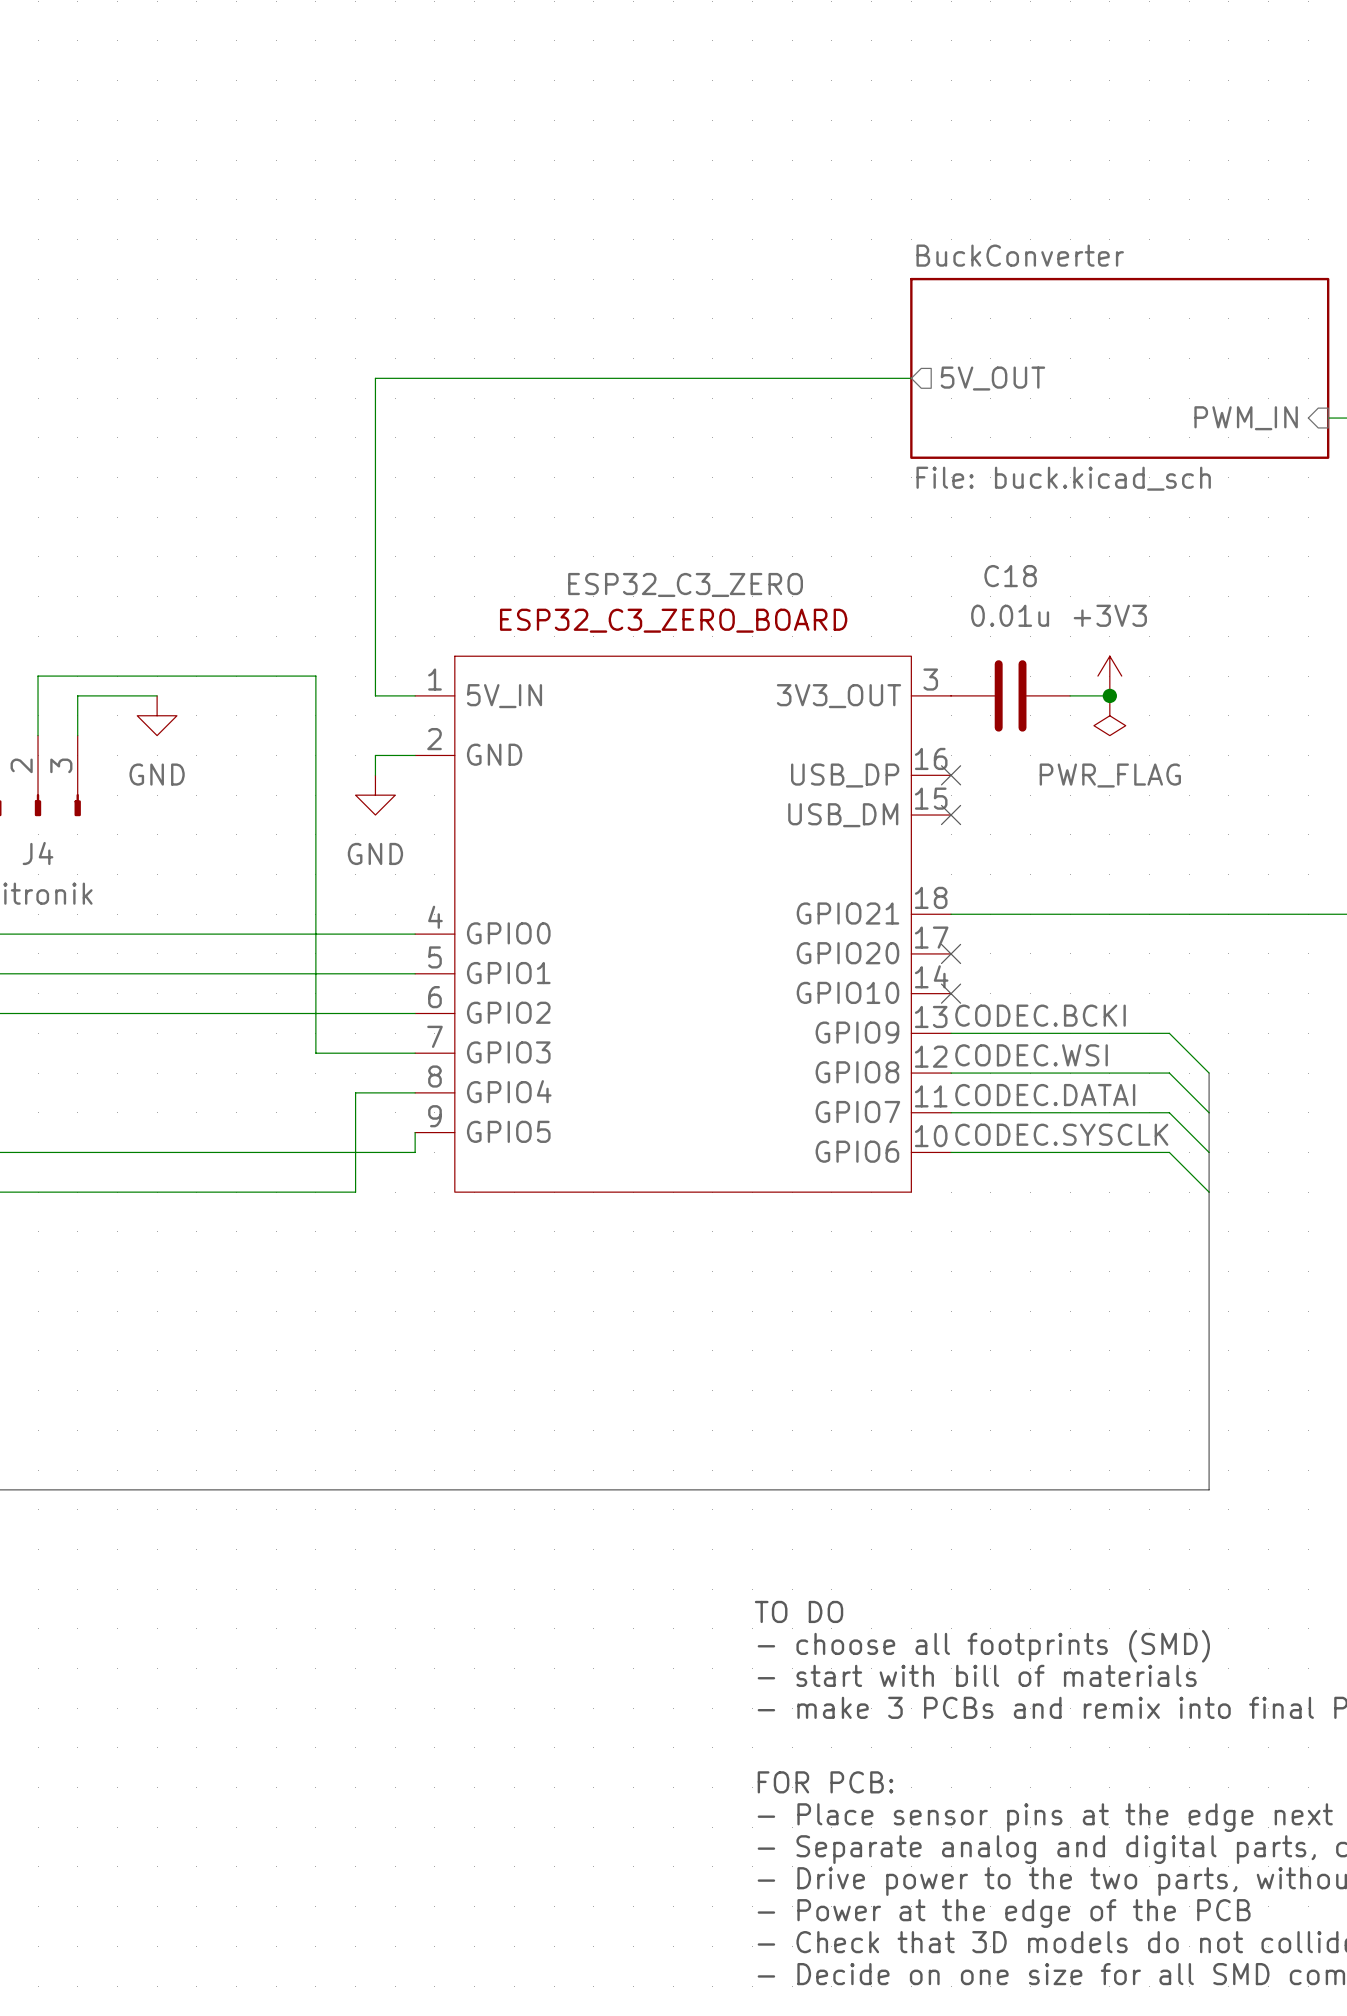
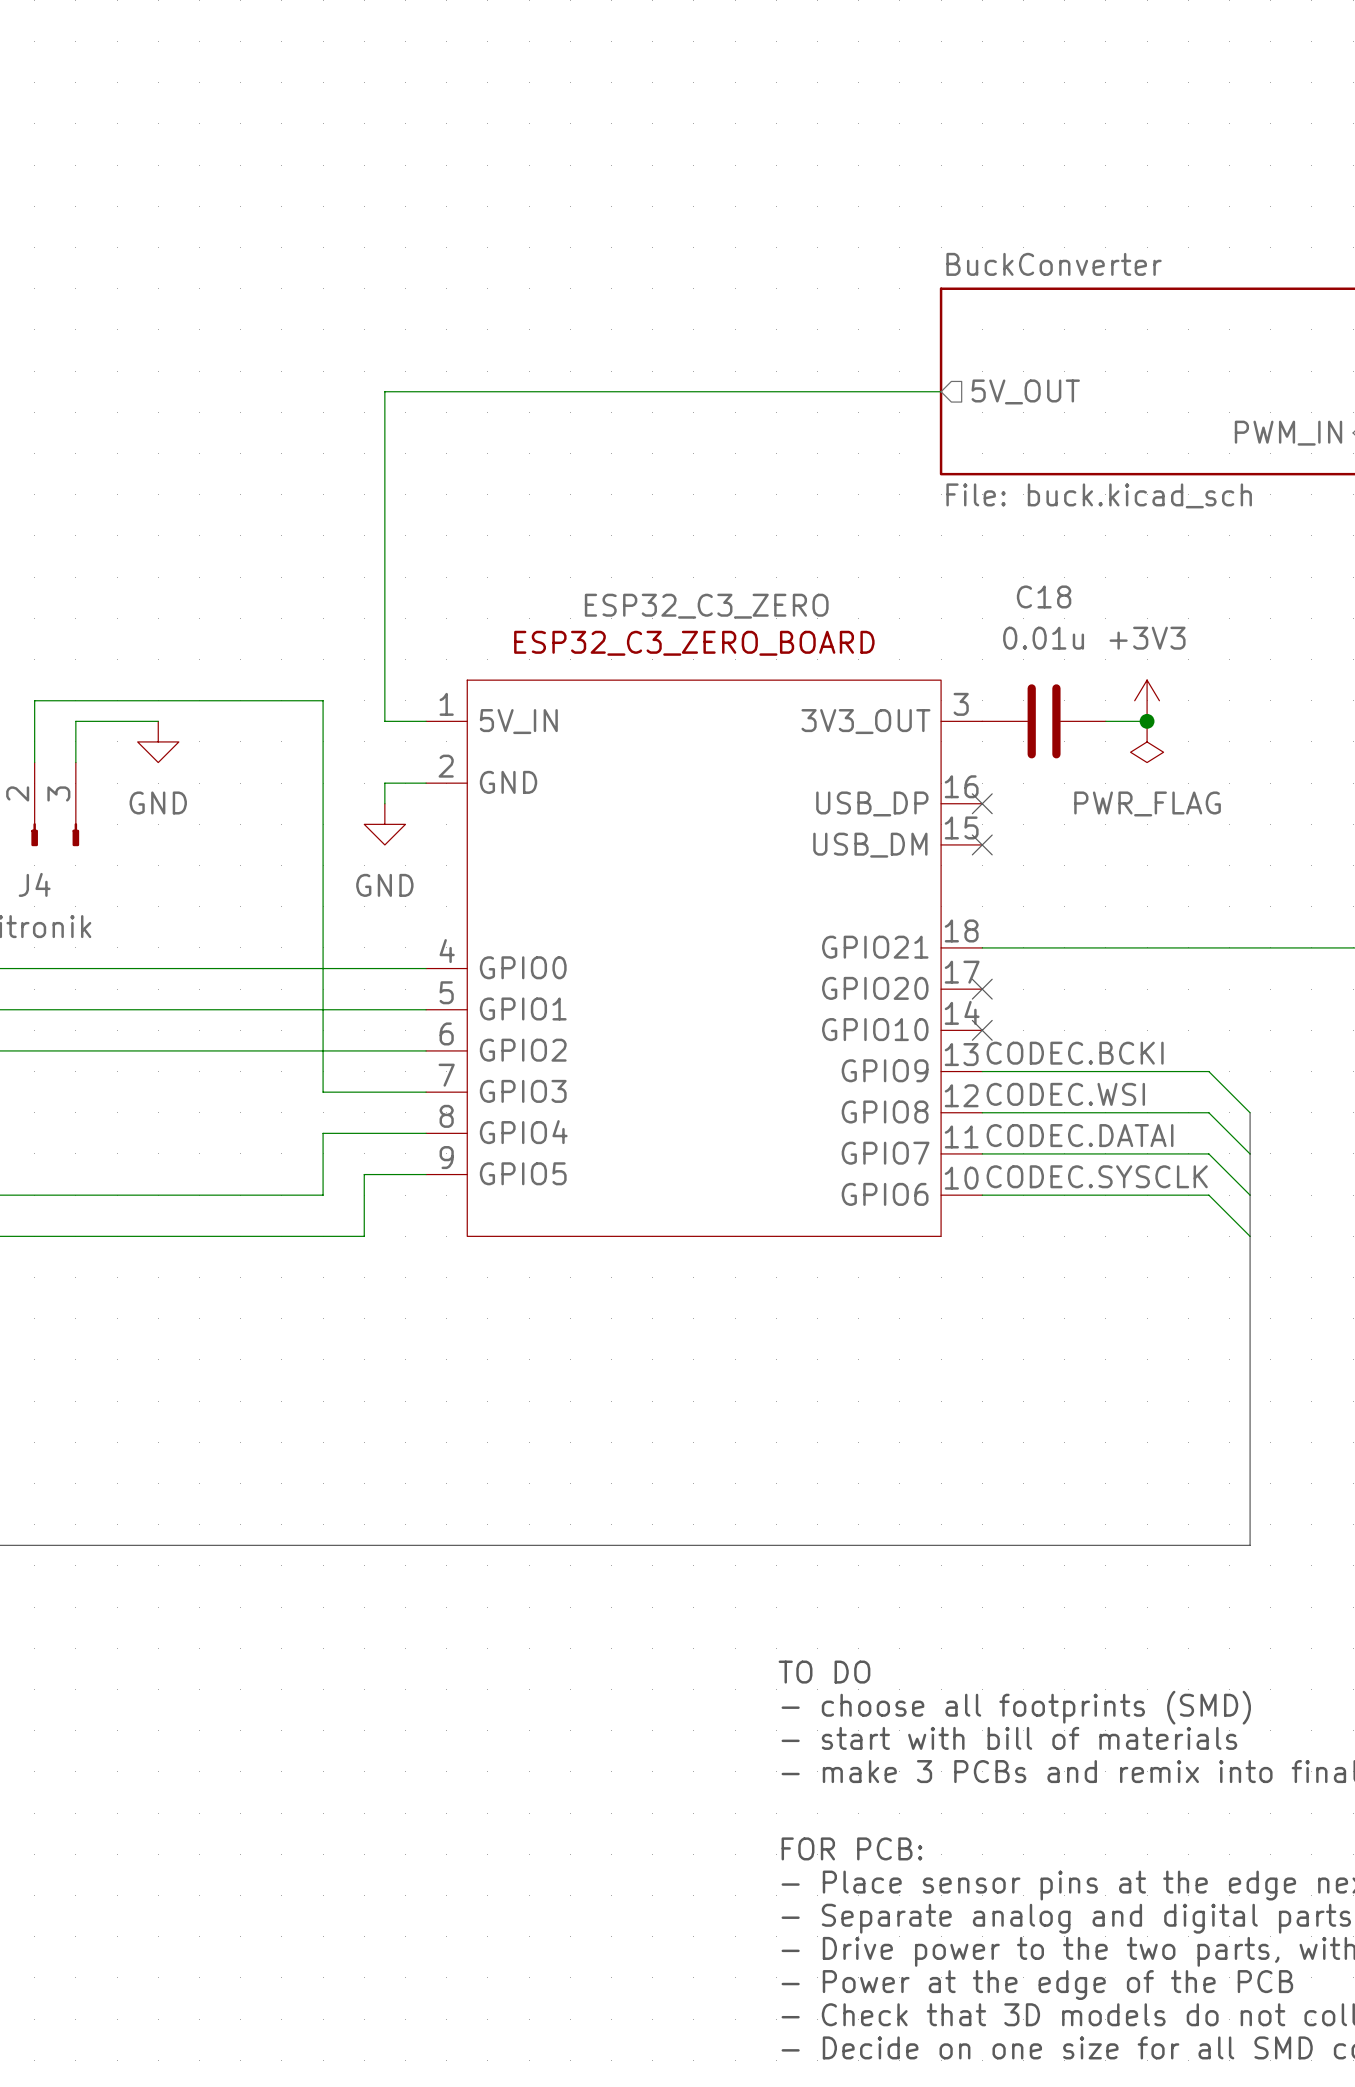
wire: (355, 1092) (355, 1132) -> (364, 1133) (323, 1133) (323, 1195)
wire: (415, 1132) (415, 1152) (315, 1152) -> (426, 1174) (364, 1174)

